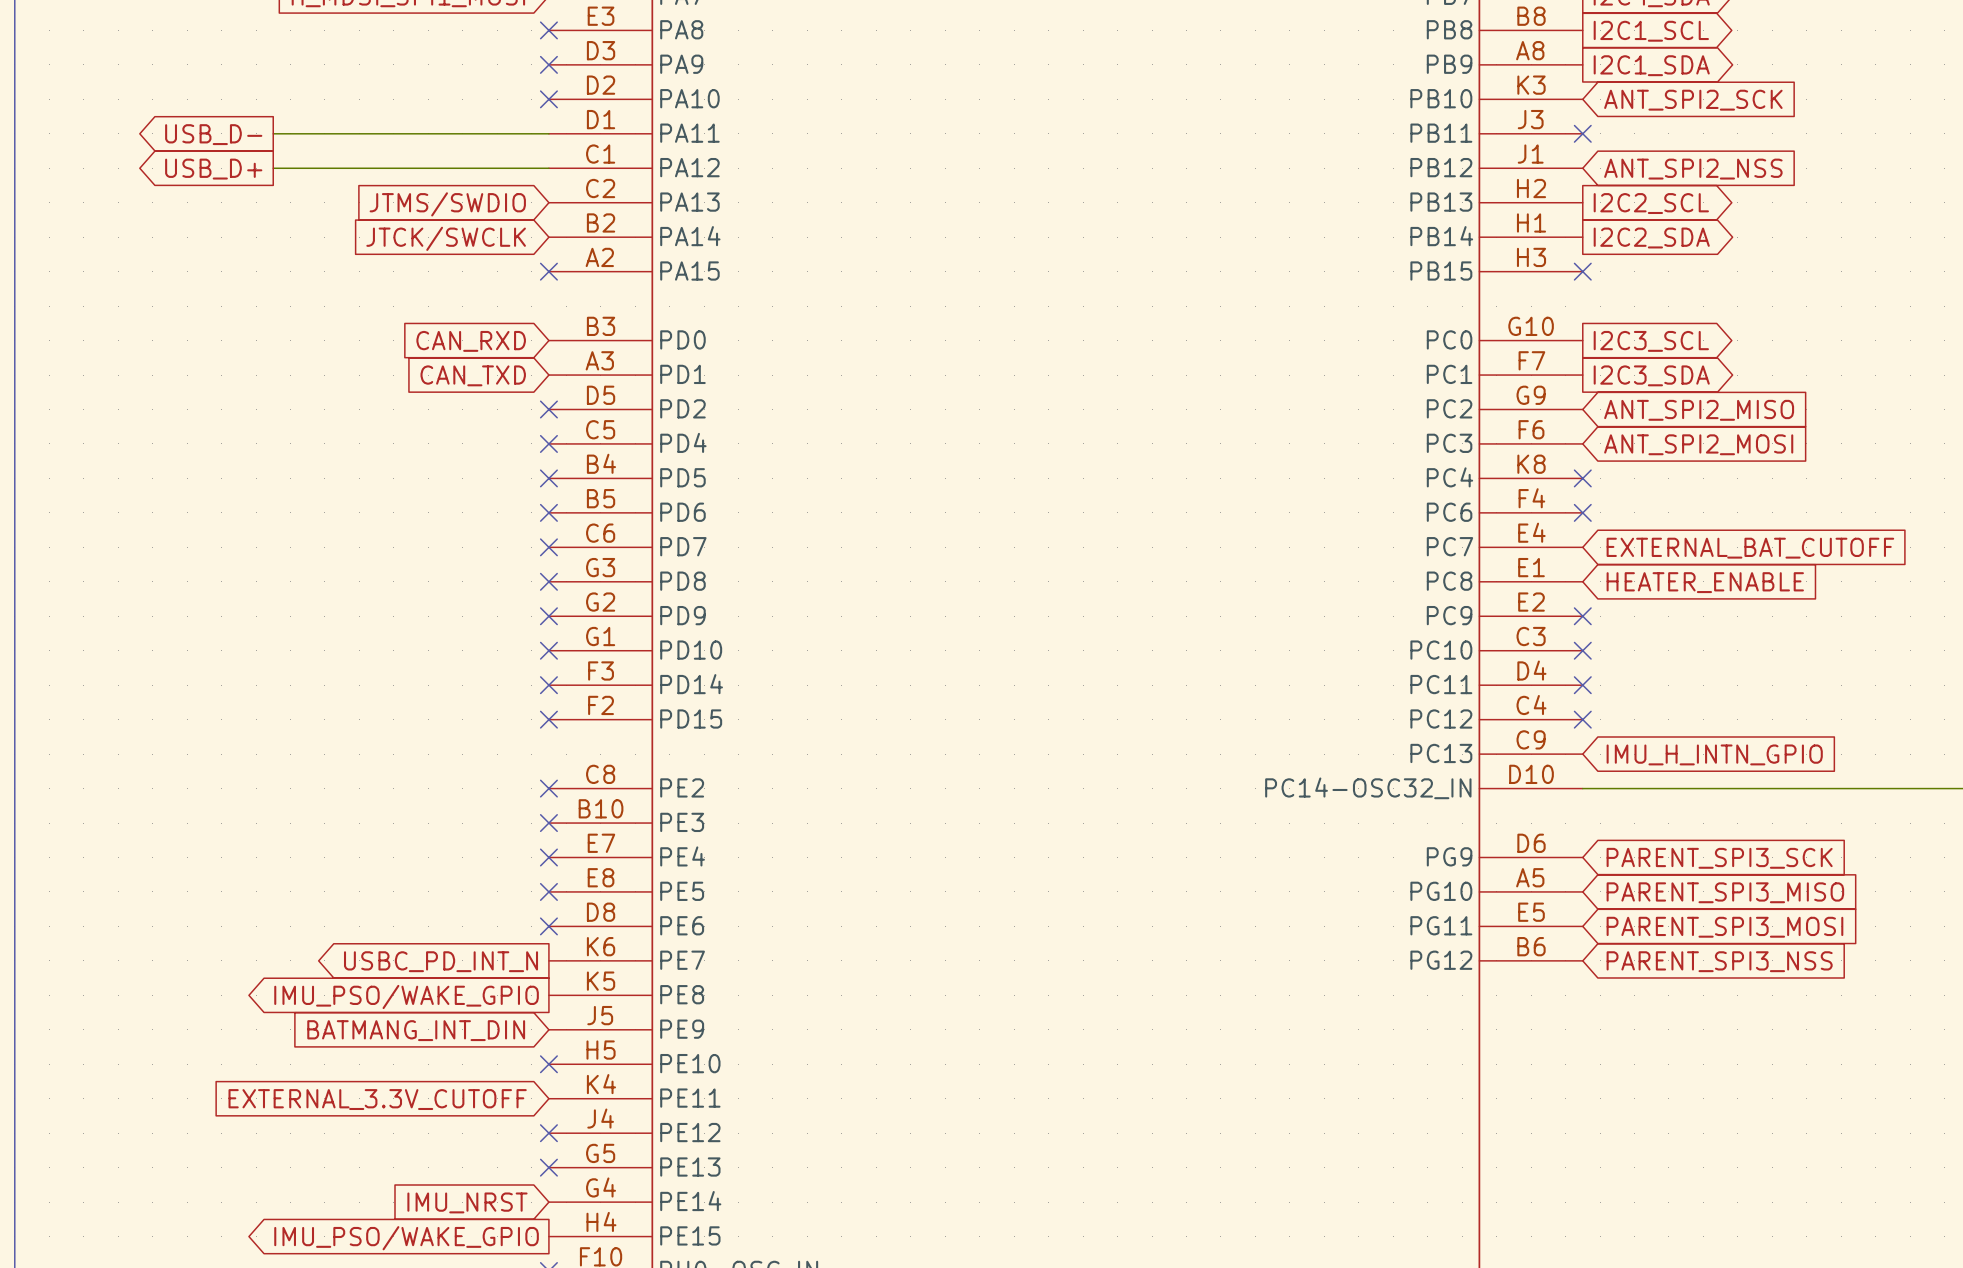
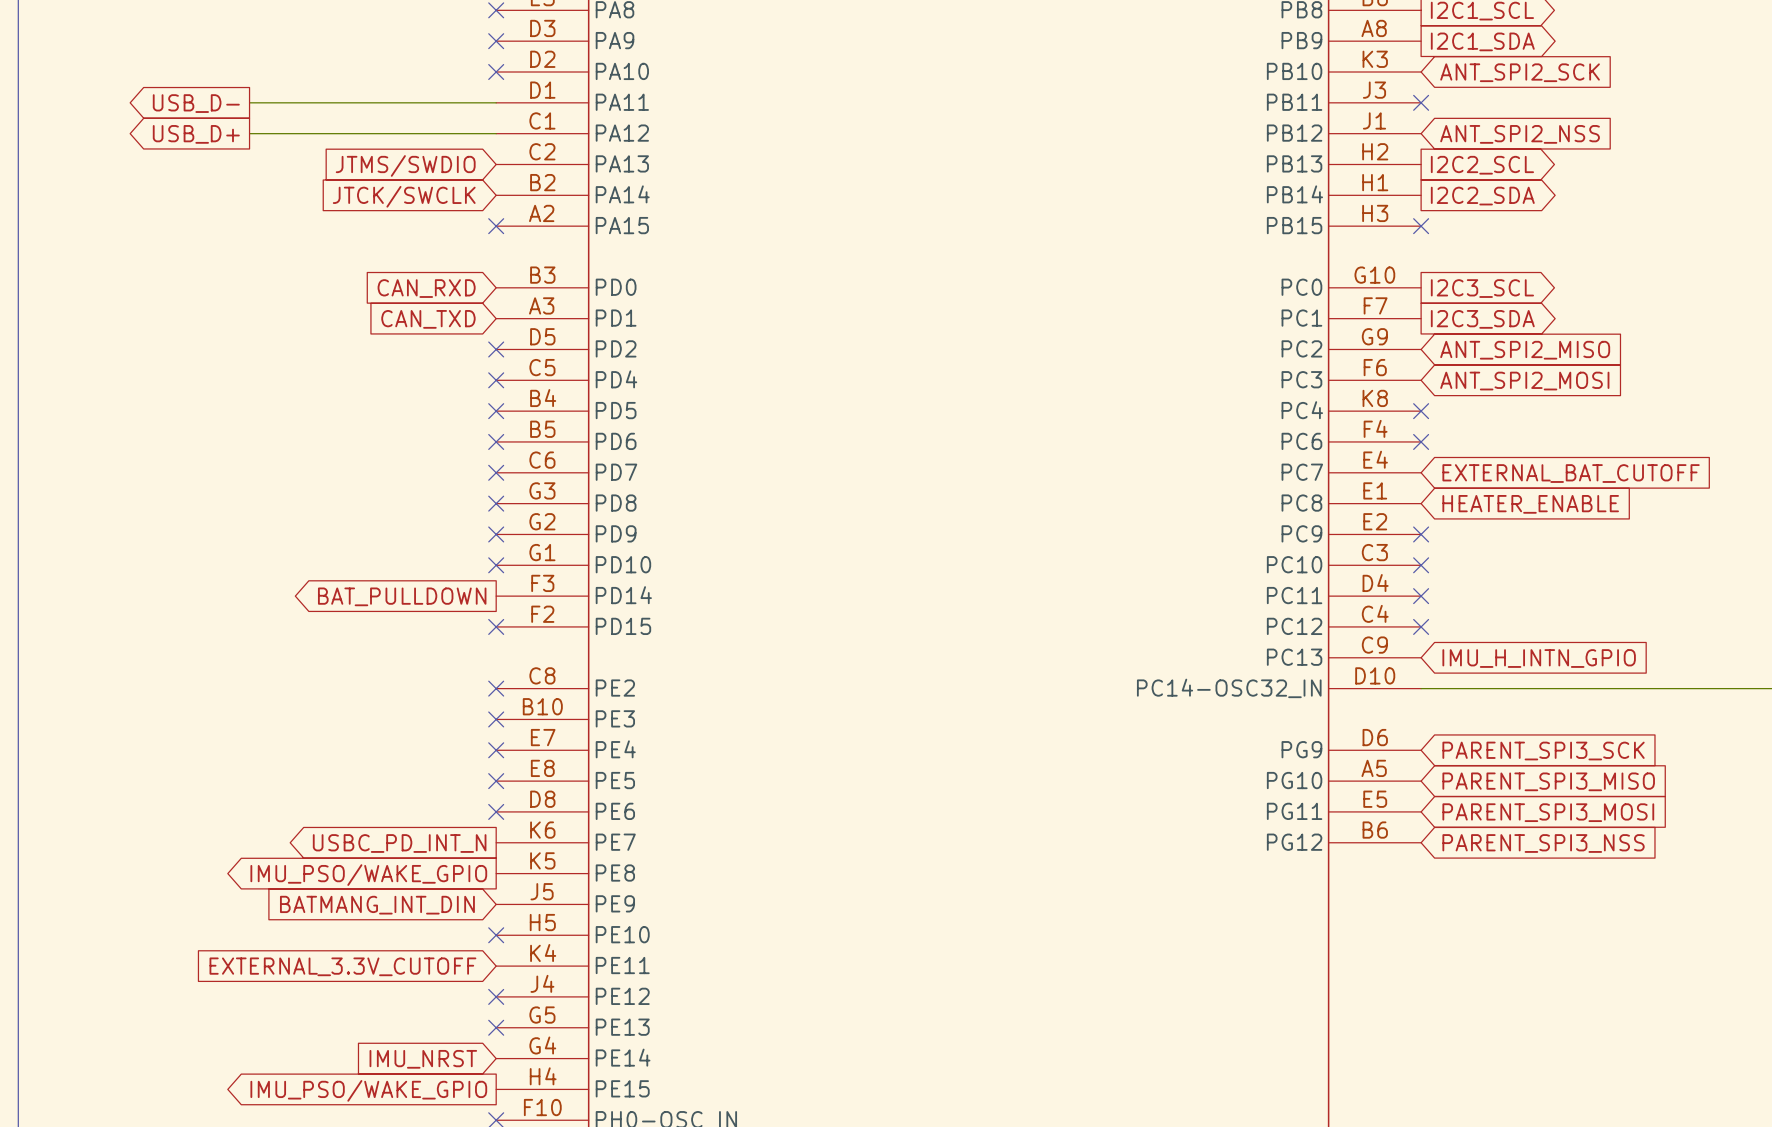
no-connect mark: (548, 685) -> none
global label: none -> BAT_PULLDOWN (402, 596)

